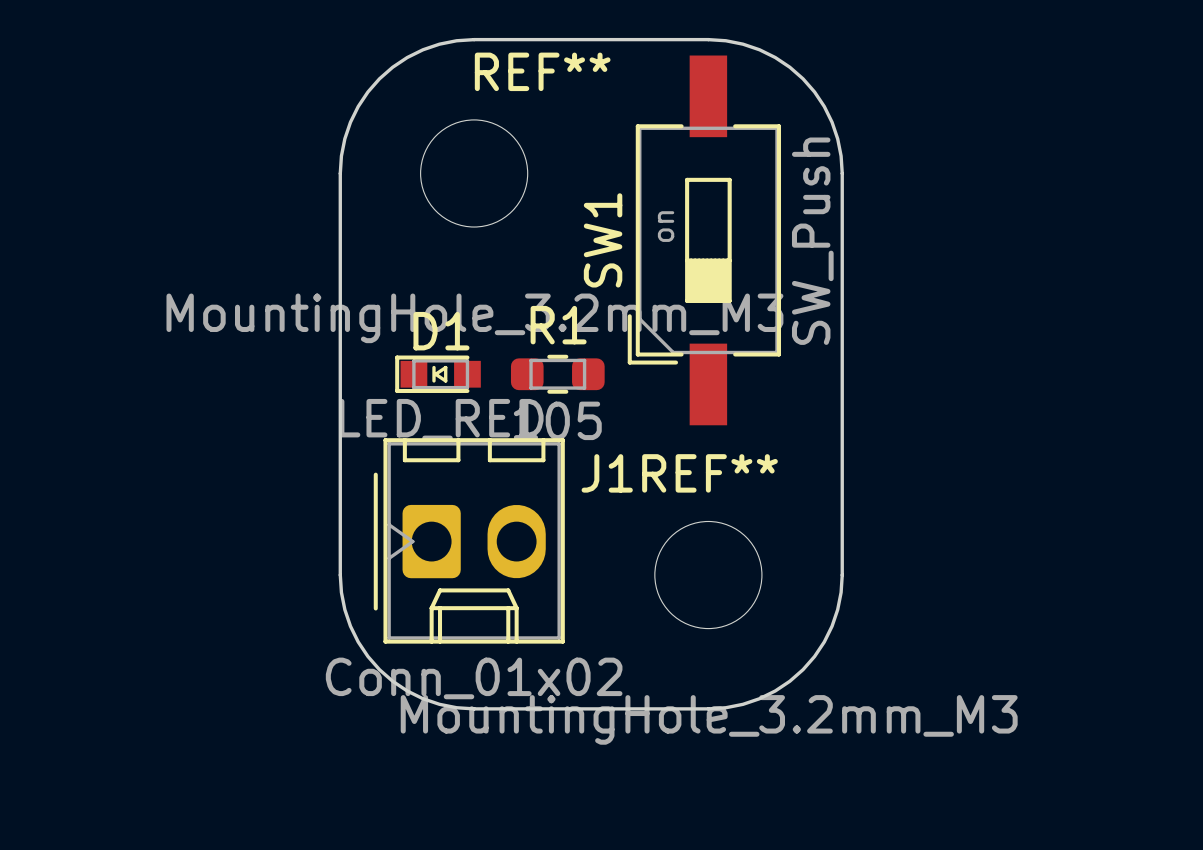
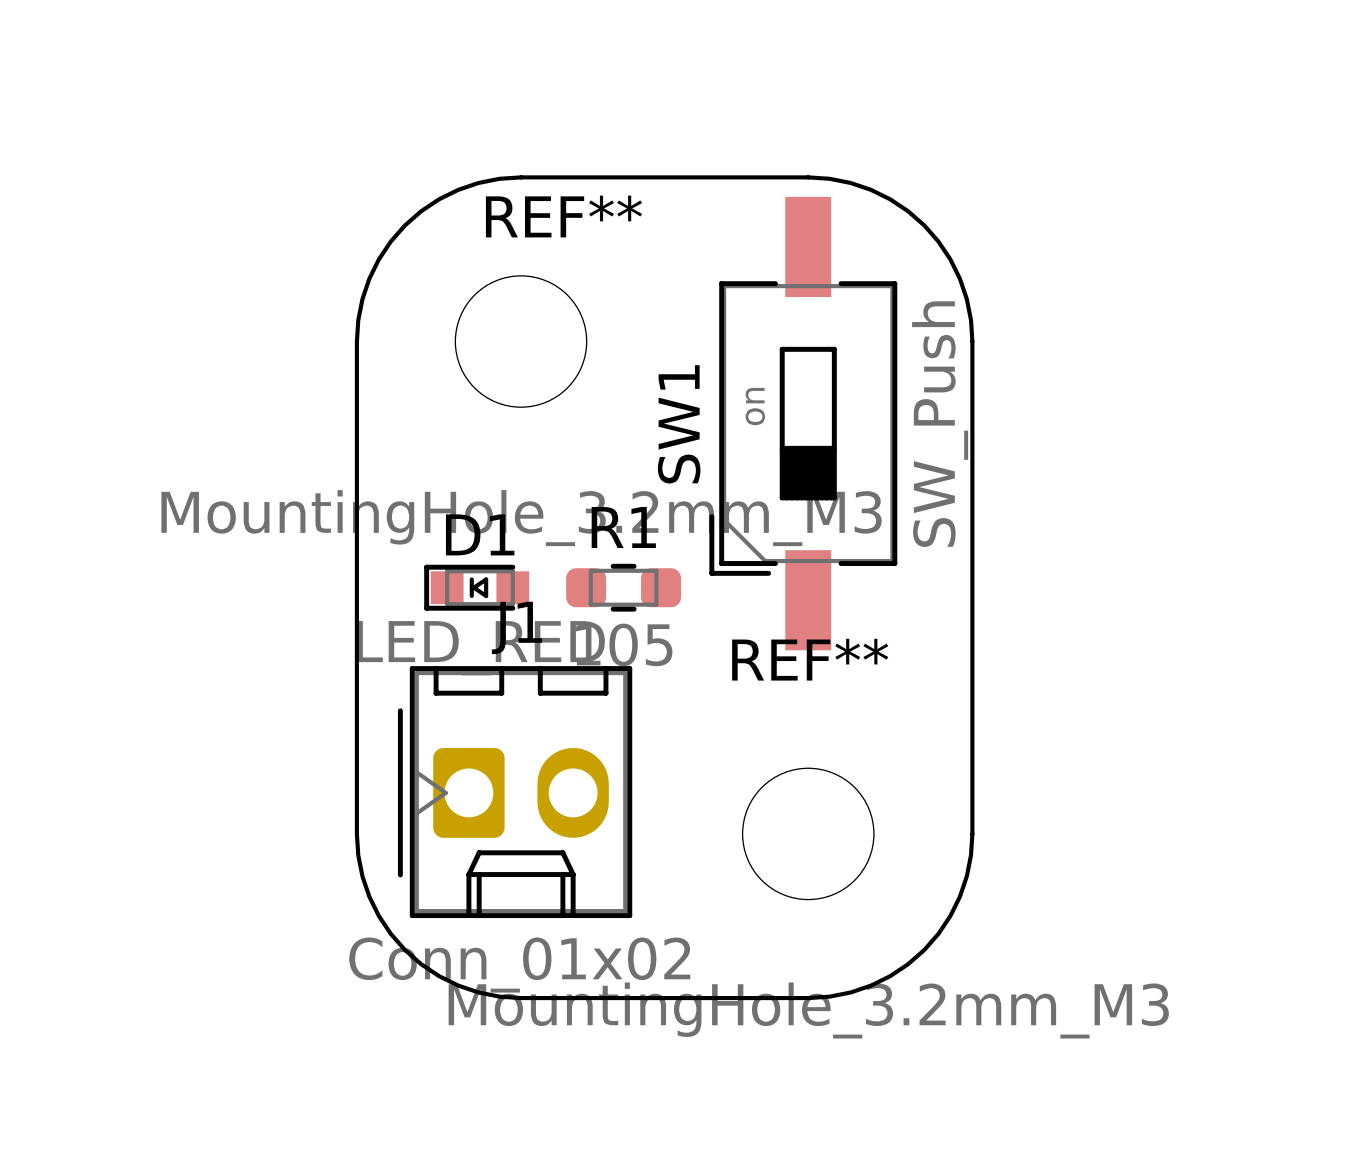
REF** name position: REF** (542, 71) -> REF** (563, 216)
J1 name position: J1 (607, 473) -> J1 (516, 627)
REF** name position: REF** (709, 473) -> REF** (810, 659)

